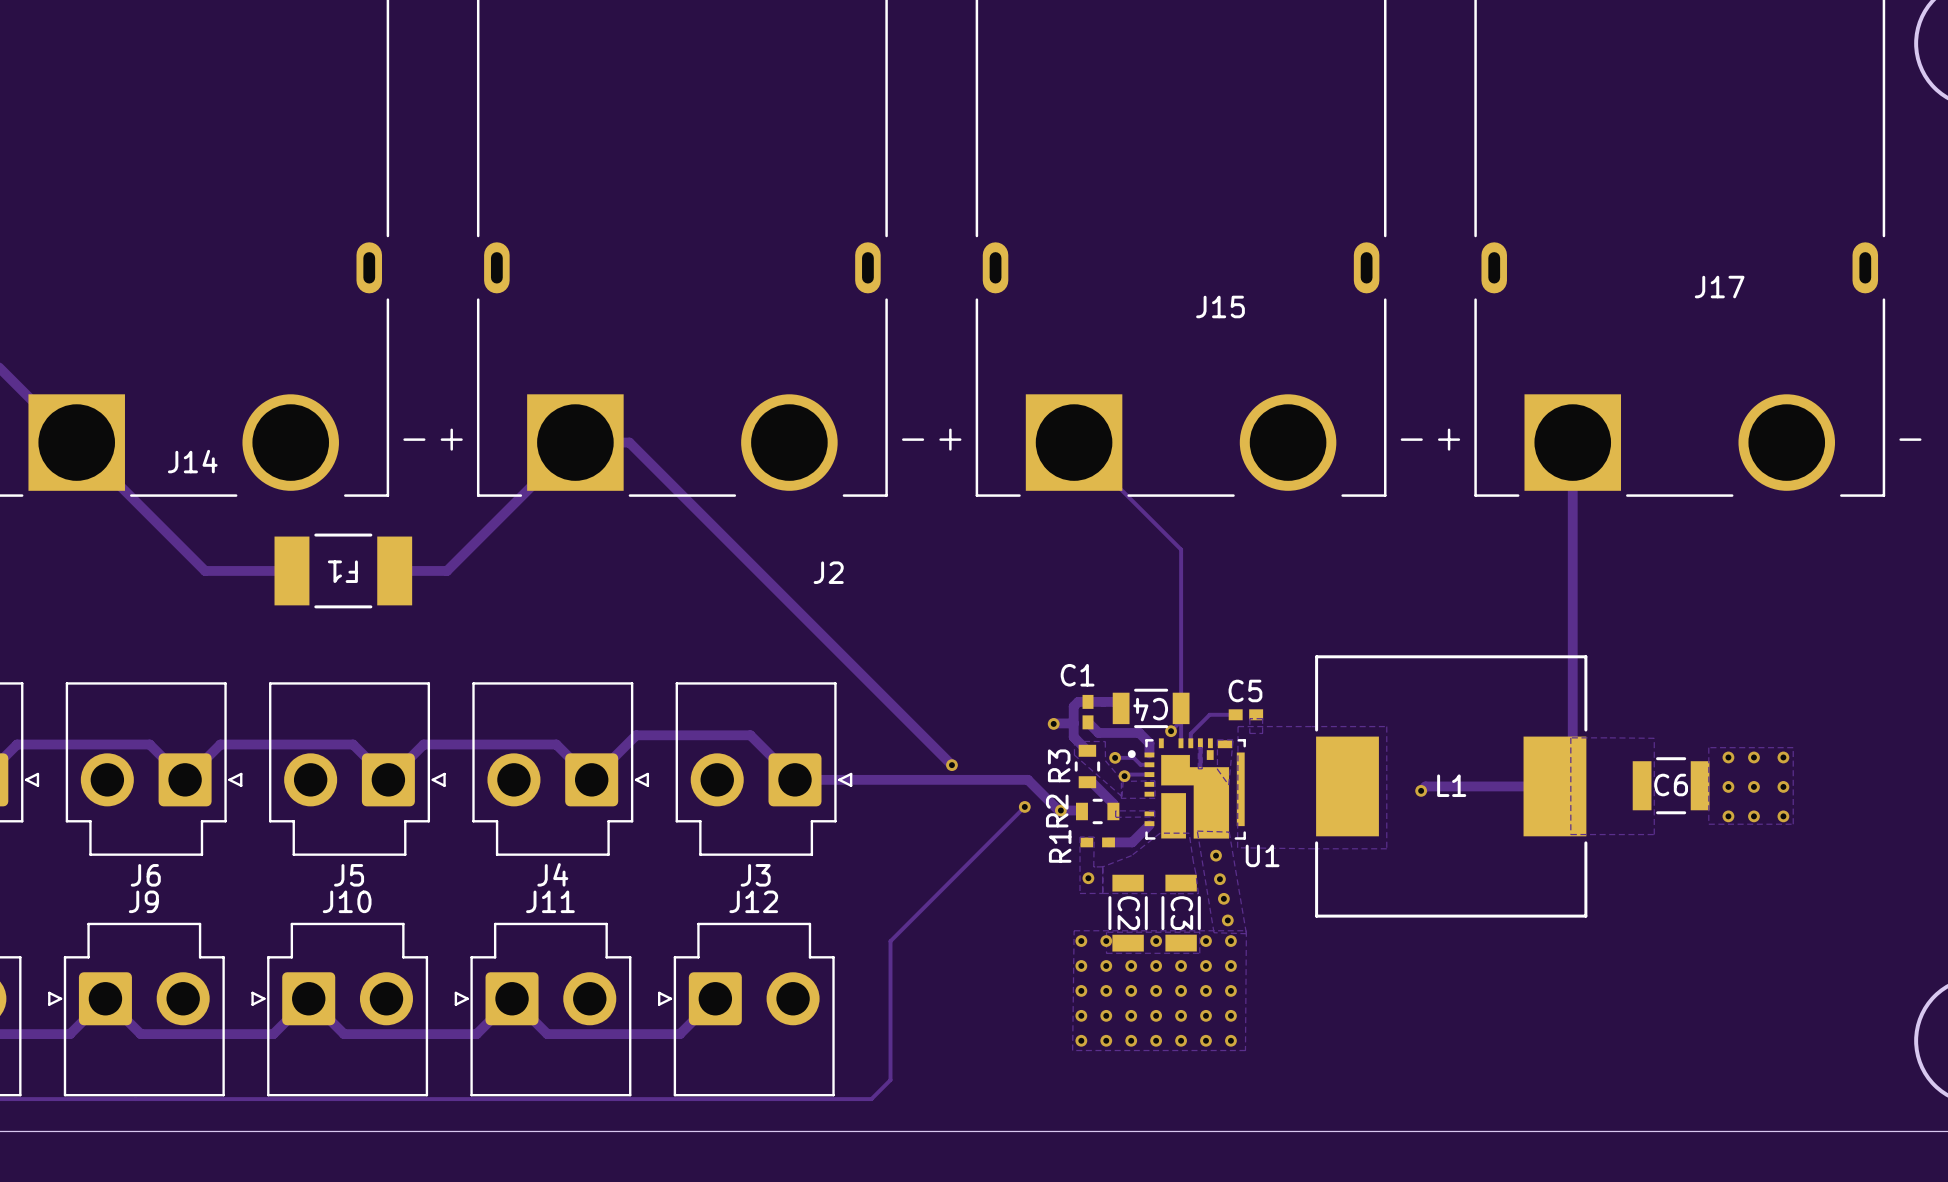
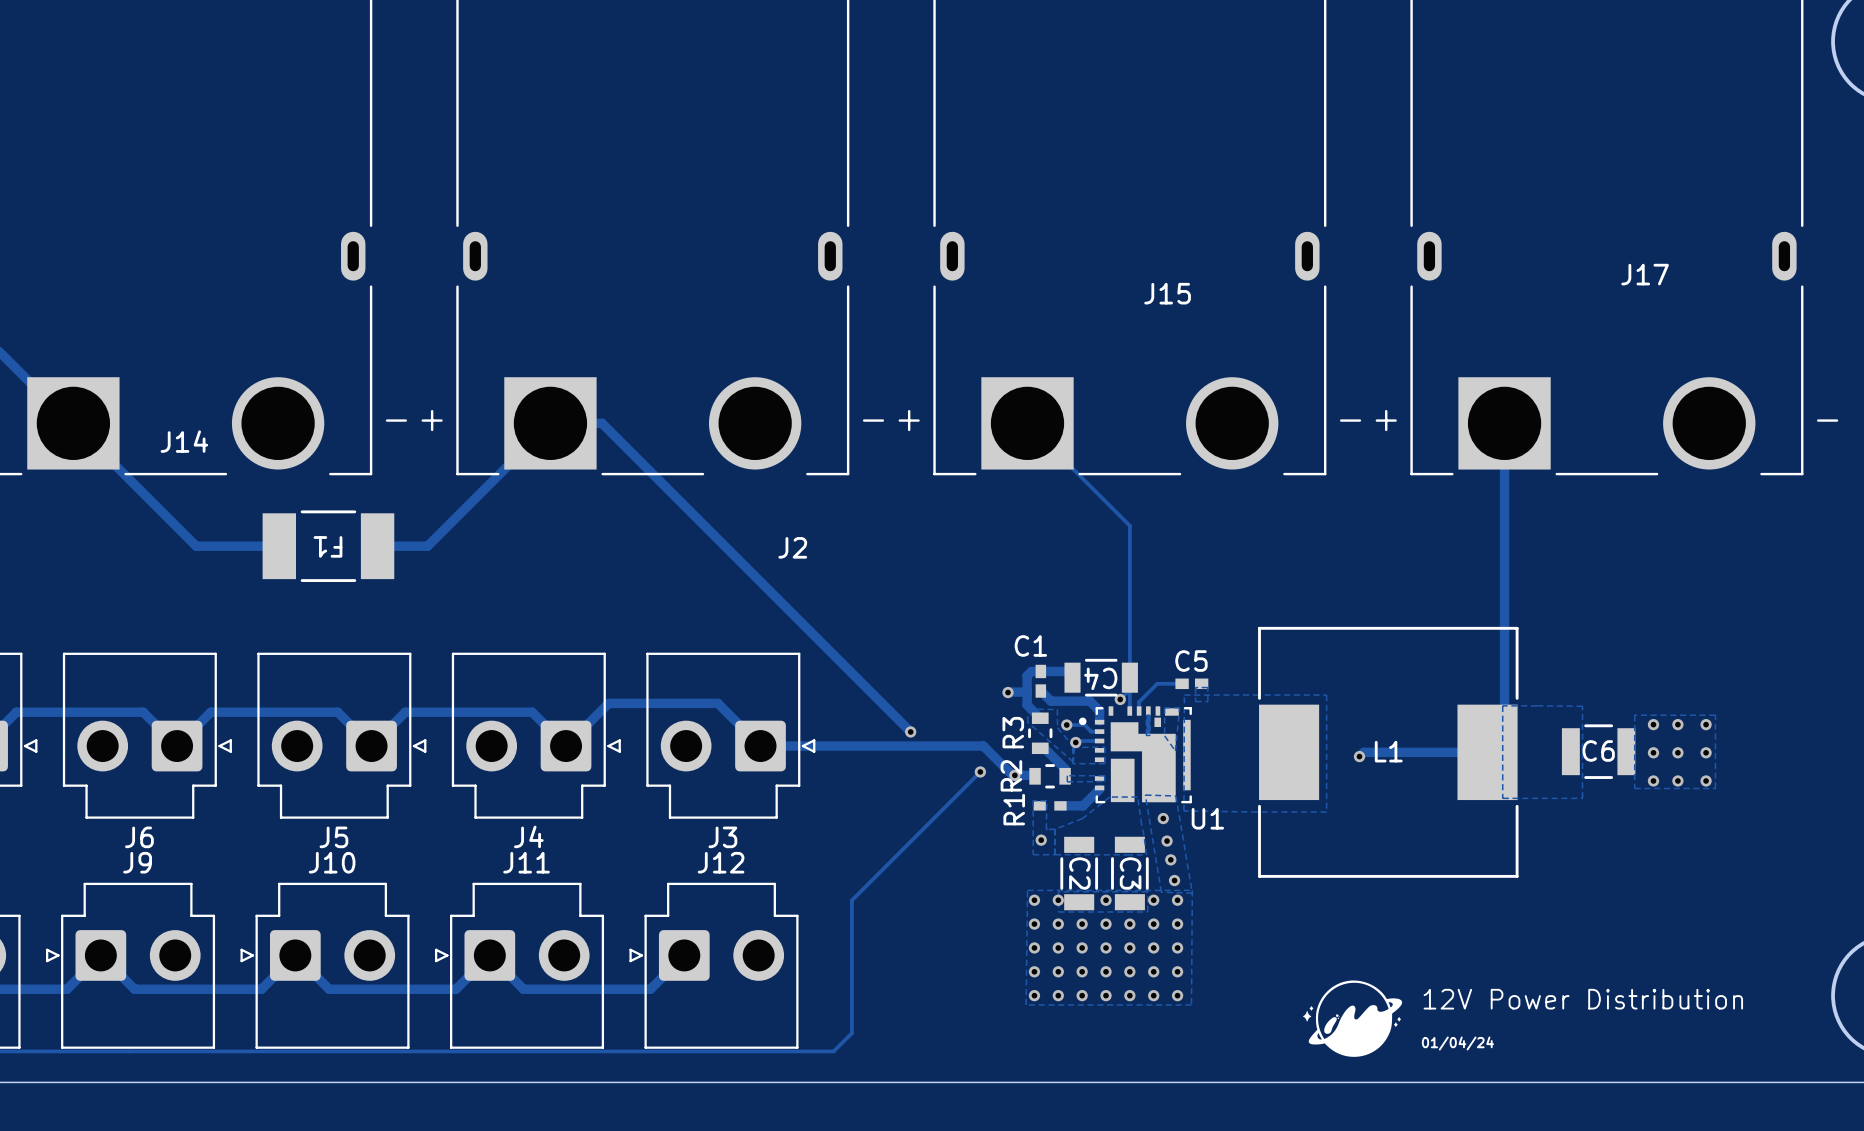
drawing: none -> [1303, 980, 1403, 1057]
text: none -> 12V Power Distribution (1583, 999)
text: none -> 01/04/24 (1457, 1043)

